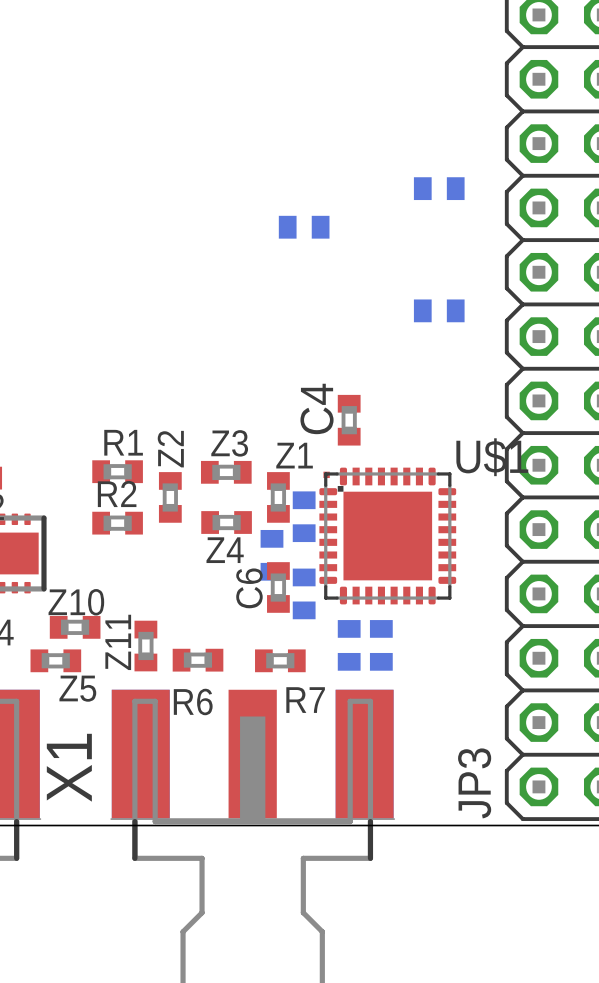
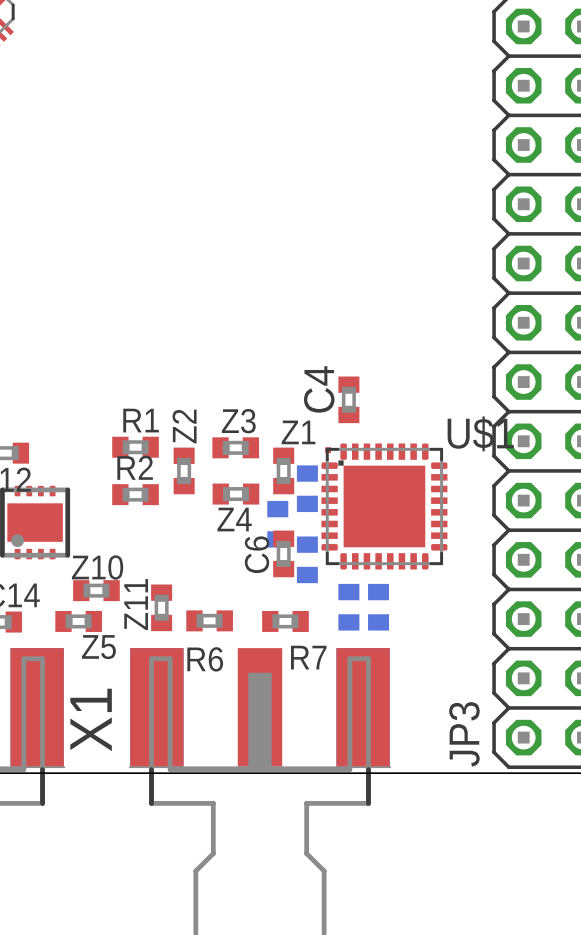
part: (439, 188) -> none
part: (304, 227) -> none
part: (439, 310) -> none

